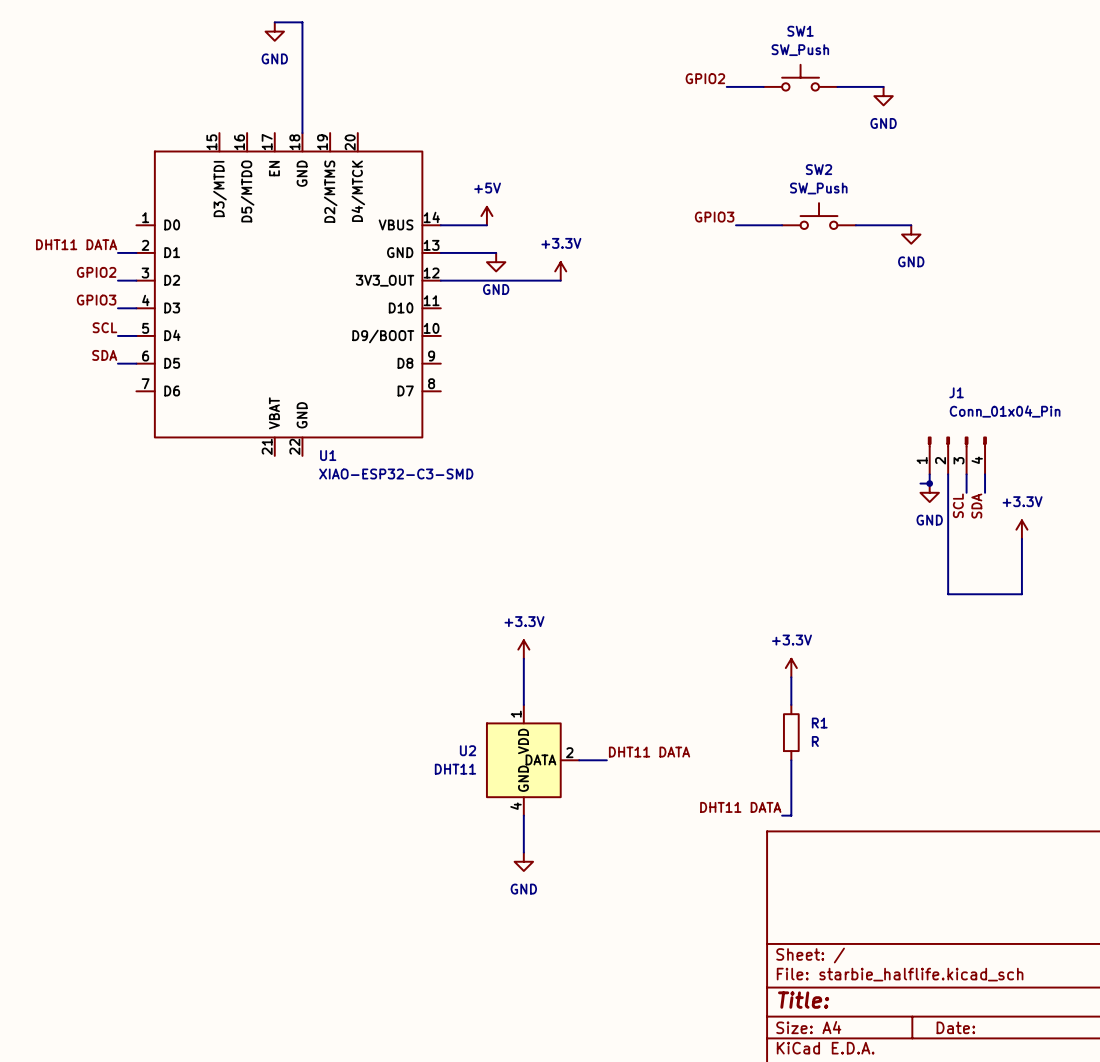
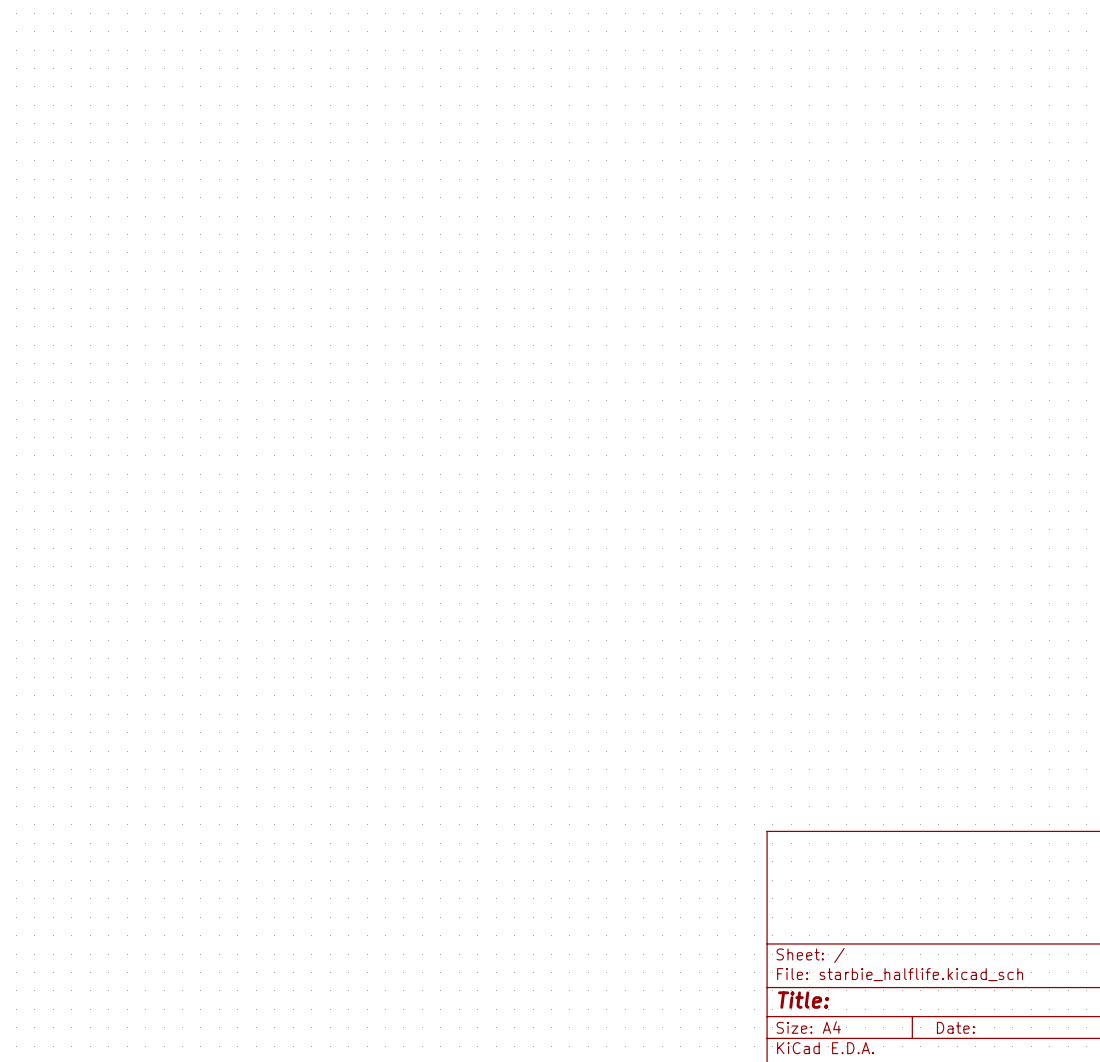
wire: (274, 22) (302, 22) (302, 133) -> none
power symbol: GND (274, 31) -> none
SW1: SW_Push (800, 77) -> none
label: GPIO2 (705, 78) -> none
wire: (726, 86) (763, 86) -> none
wire: (837, 86) (883, 86) -> none
power symbol: GND (883, 96) -> none
power symbol: +5V (486, 216) -> none
SW2: SW_Push (819, 216) -> none
label: GPIO3 (714, 217) -> none
wire: (440, 225) (486, 225) -> none
wire: (735, 225) (782, 225) -> none
wire: (855, 225) (911, 225) -> none
power symbol: GND (911, 234) -> none
label: DHT11 DATA (76, 244) -> none
wire: (117, 252) (136, 252) -> none
wire: (440, 252) (496, 252) -> none
power symbol: GND (496, 262) -> none
power symbol: +3.3V (560, 271) -> none
label: GPIO2 (96, 272) -> none
wire: (117, 280) (136, 280) -> none
wire: (440, 280) (560, 280) -> none
U1: XIAO-ESP32-C3-SMD (288, 294) -> none
label: GPIO3 (96, 300) -> none
wire: (117, 308) (136, 308) -> none
label: SCL (104, 327) -> none
wire: (117, 335) (136, 335) -> none
label: SDA (104, 355) -> none
wire: (117, 363) (136, 363) -> none
J1: Conn_01x04_Pin (957, 455) -> none
wire: (929, 474) (929, 483) (920, 483) -> none
wire: (948, 474) (948, 594) (1021, 594) (1021, 538) -> none
wire: (966, 474) (966, 492) -> none
wire: (985, 474) (985, 492) -> none
junction: (929, 483) -> none
power symbol: GND (929, 492) -> none
label: SCL (958, 505) -> none
label: SDA (976, 506) -> none
power symbol: +3.3V (1021, 529) -> none
power symbol: +3.3V (523, 649) -> none
wire: (523, 658) (523, 704) -> none
power symbol: +3.3V (791, 668) -> none
wire: (791, 677) (791, 704) -> none
R1: R (791, 732) -> none
label: DHT11 DATA (649, 752) -> none
U2: DHT11 (532, 760) -> none
wire: (579, 760) (606, 760) -> none
wire: (791, 760) (791, 815) (782, 815) -> none
label: DHT11 DATA (740, 807) -> none
wire: (523, 815) (523, 852) -> none
power symbol: GND (523, 861) -> none

